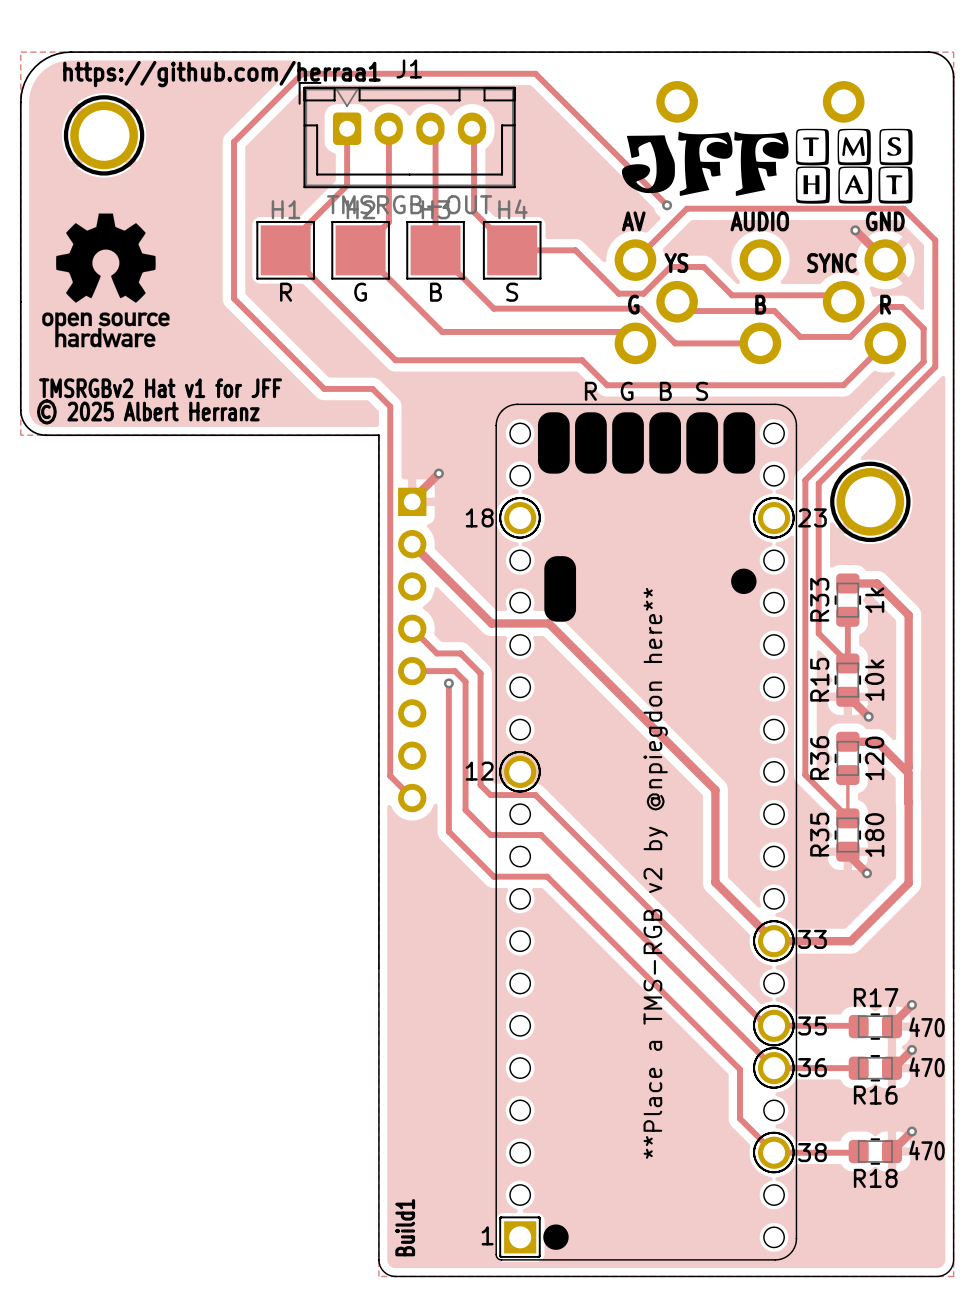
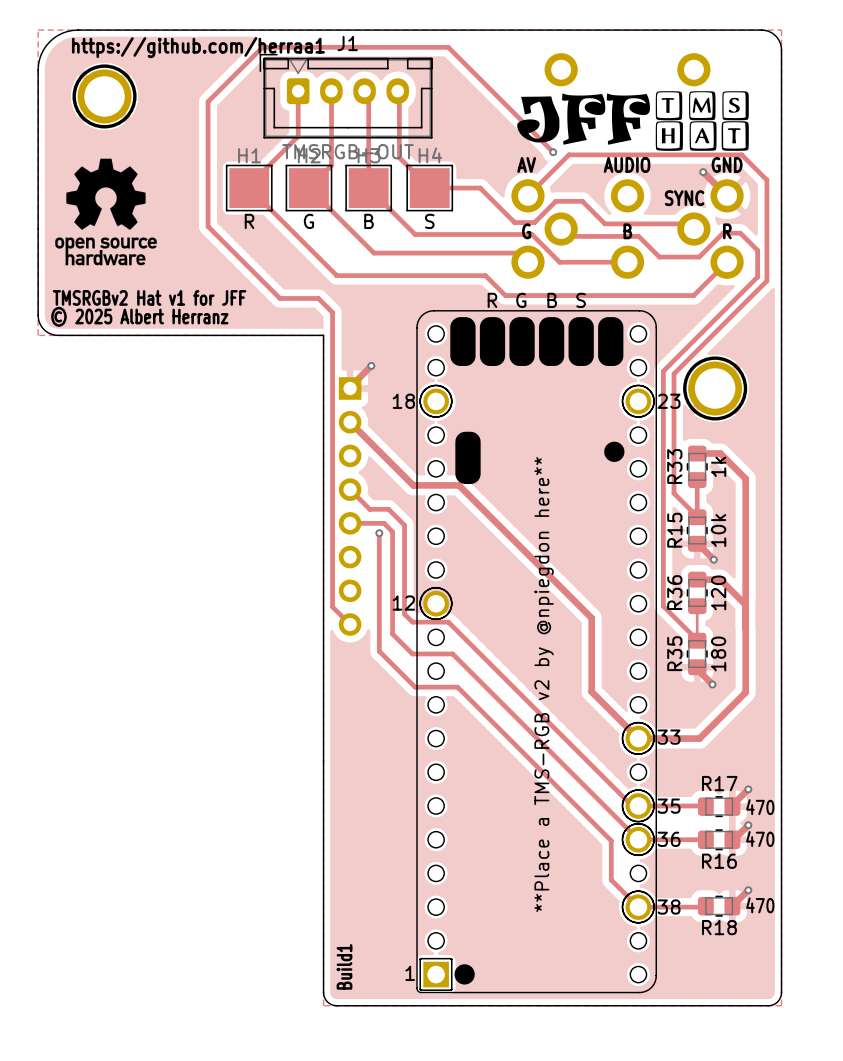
text: YS (676, 263) -> none

